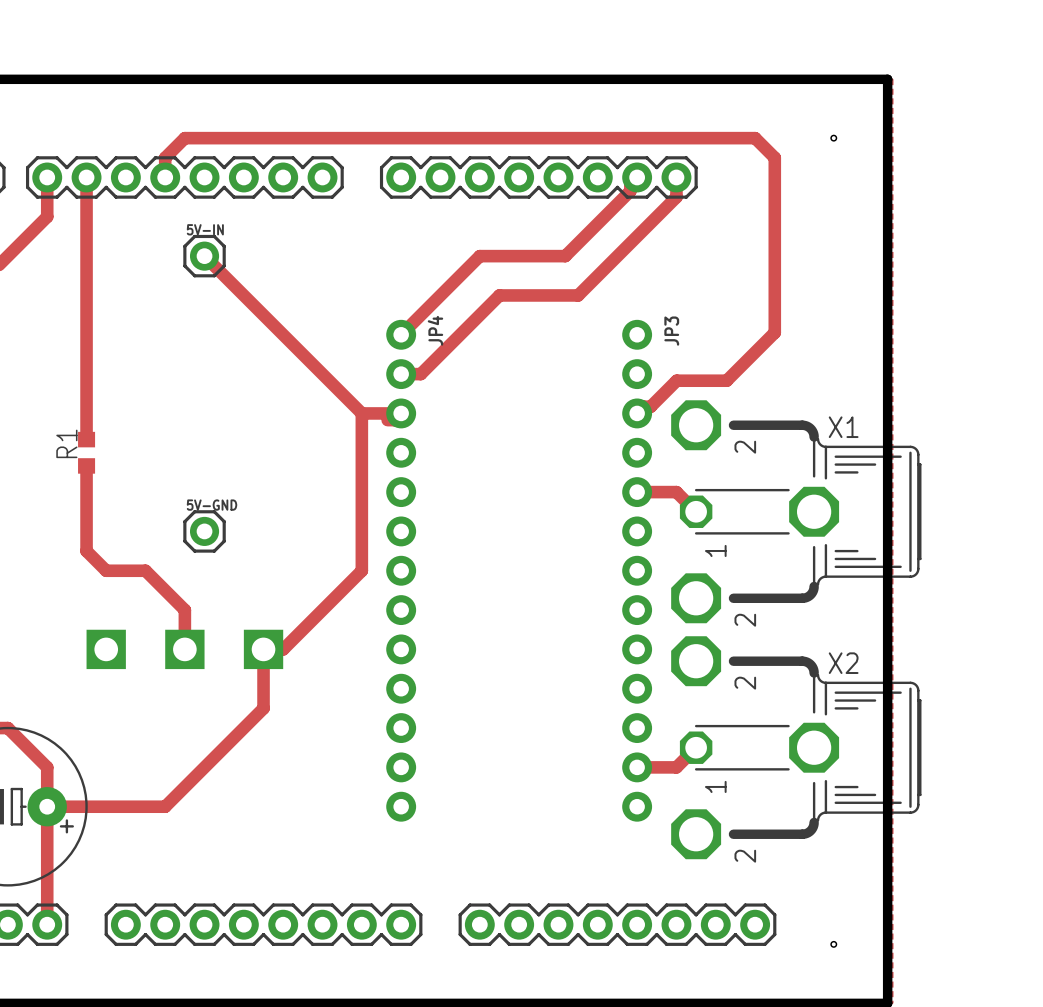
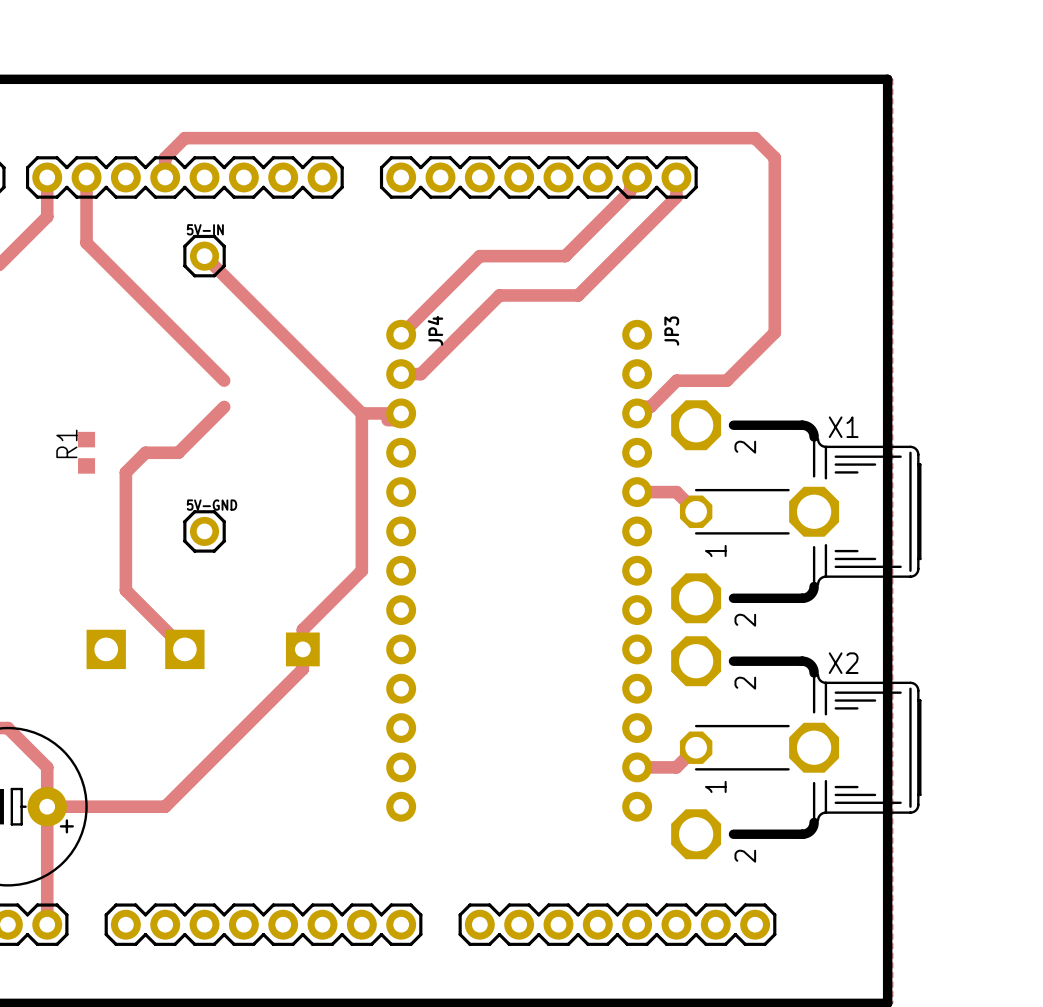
hole: (833, 138) -> none
top track: (86, 242) (86, 439) -> (86, 242) (224, 380)
top track: (86, 465) (86, 551) (106, 570) (145, 570) (184, 610) (184, 649) -> (224, 406) (178, 452) (145, 452) (125, 472) (125, 590) (184, 649)
top track: (302, 629) (283, 649) (263, 649) (263, 708) -> (302, 629) (302, 669) (263, 708)
part: (263, 649) -> none
part: none -> (302, 649)
hole: (833, 944) -> none

